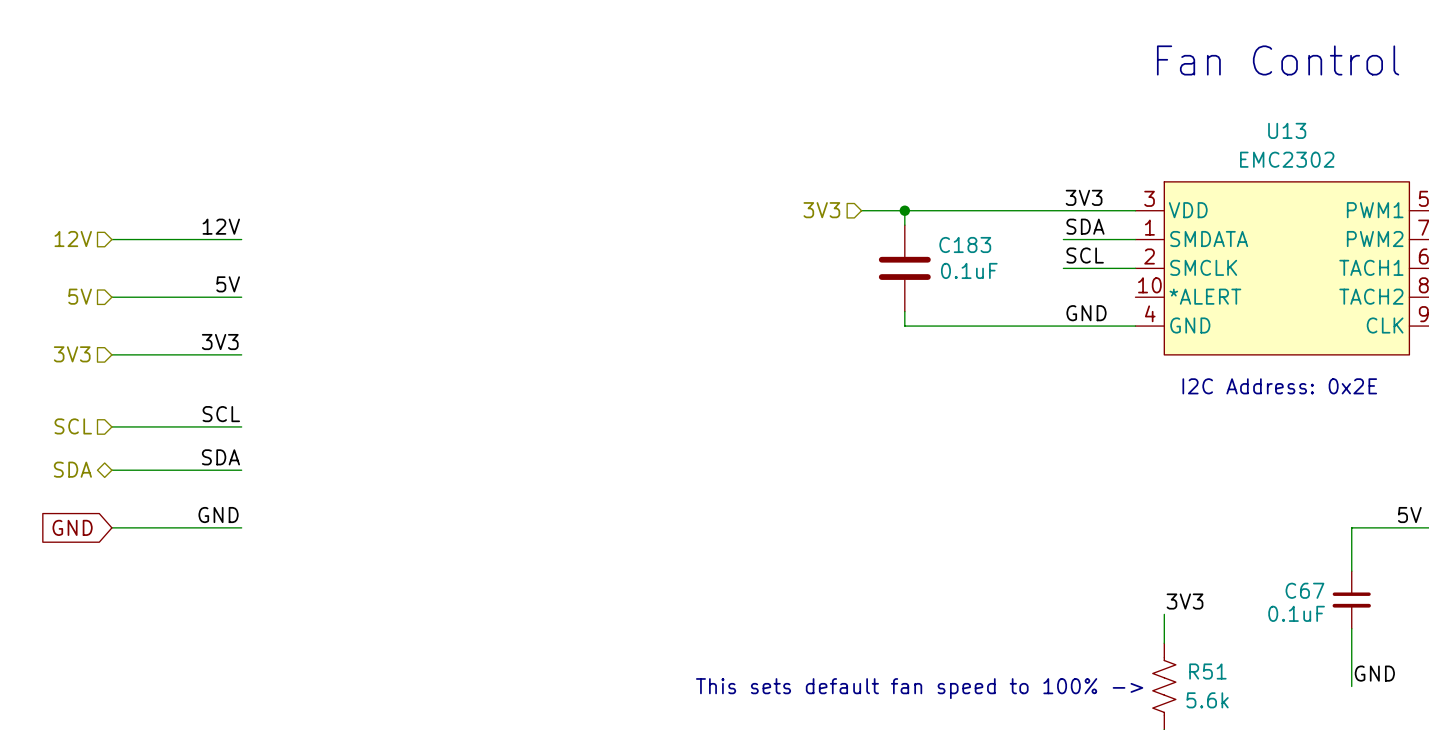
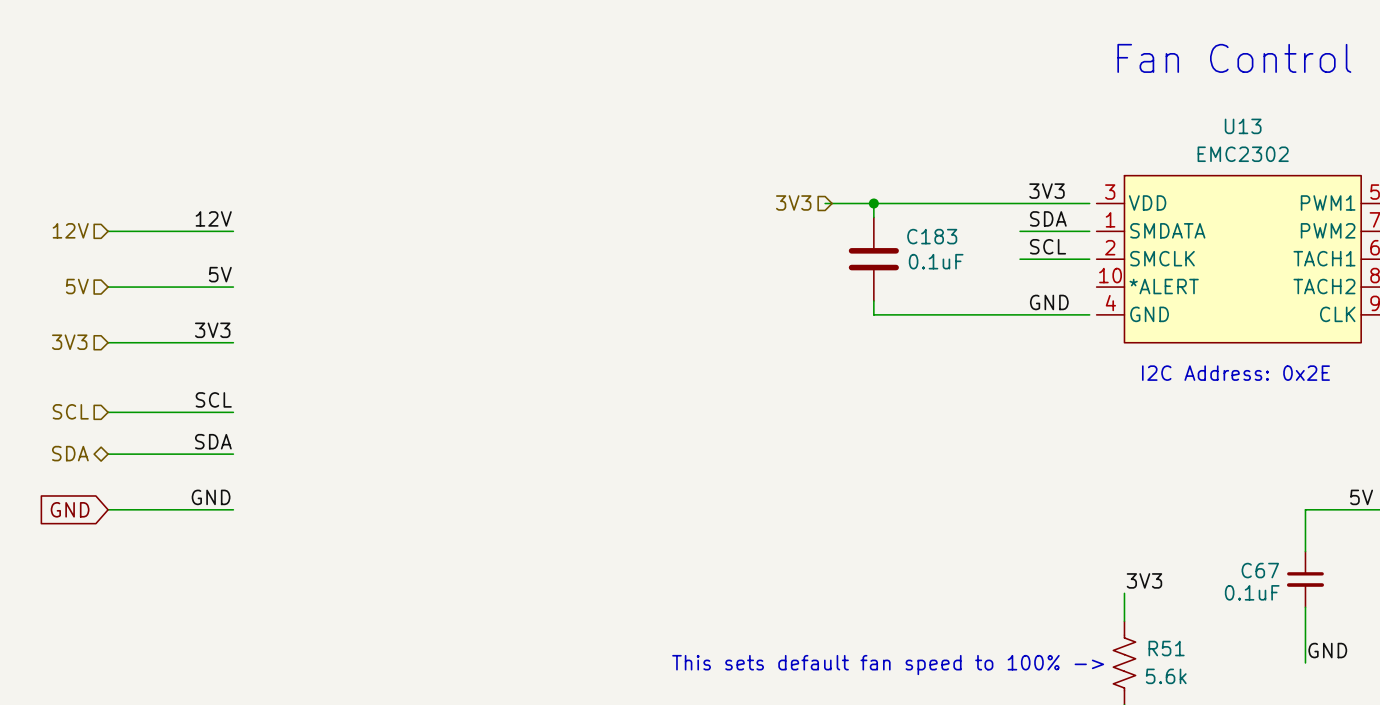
wire: (1128, 210) (1135, 210) -> (825, 203) (832, 203)
wire: (1128, 239) (1135, 239) -> (1020, 231) (1027, 231)
wire: (1128, 268) (1135, 268) -> (1020, 259) (1027, 259)
wire: (1128, 326) (1135, 326) -> none

